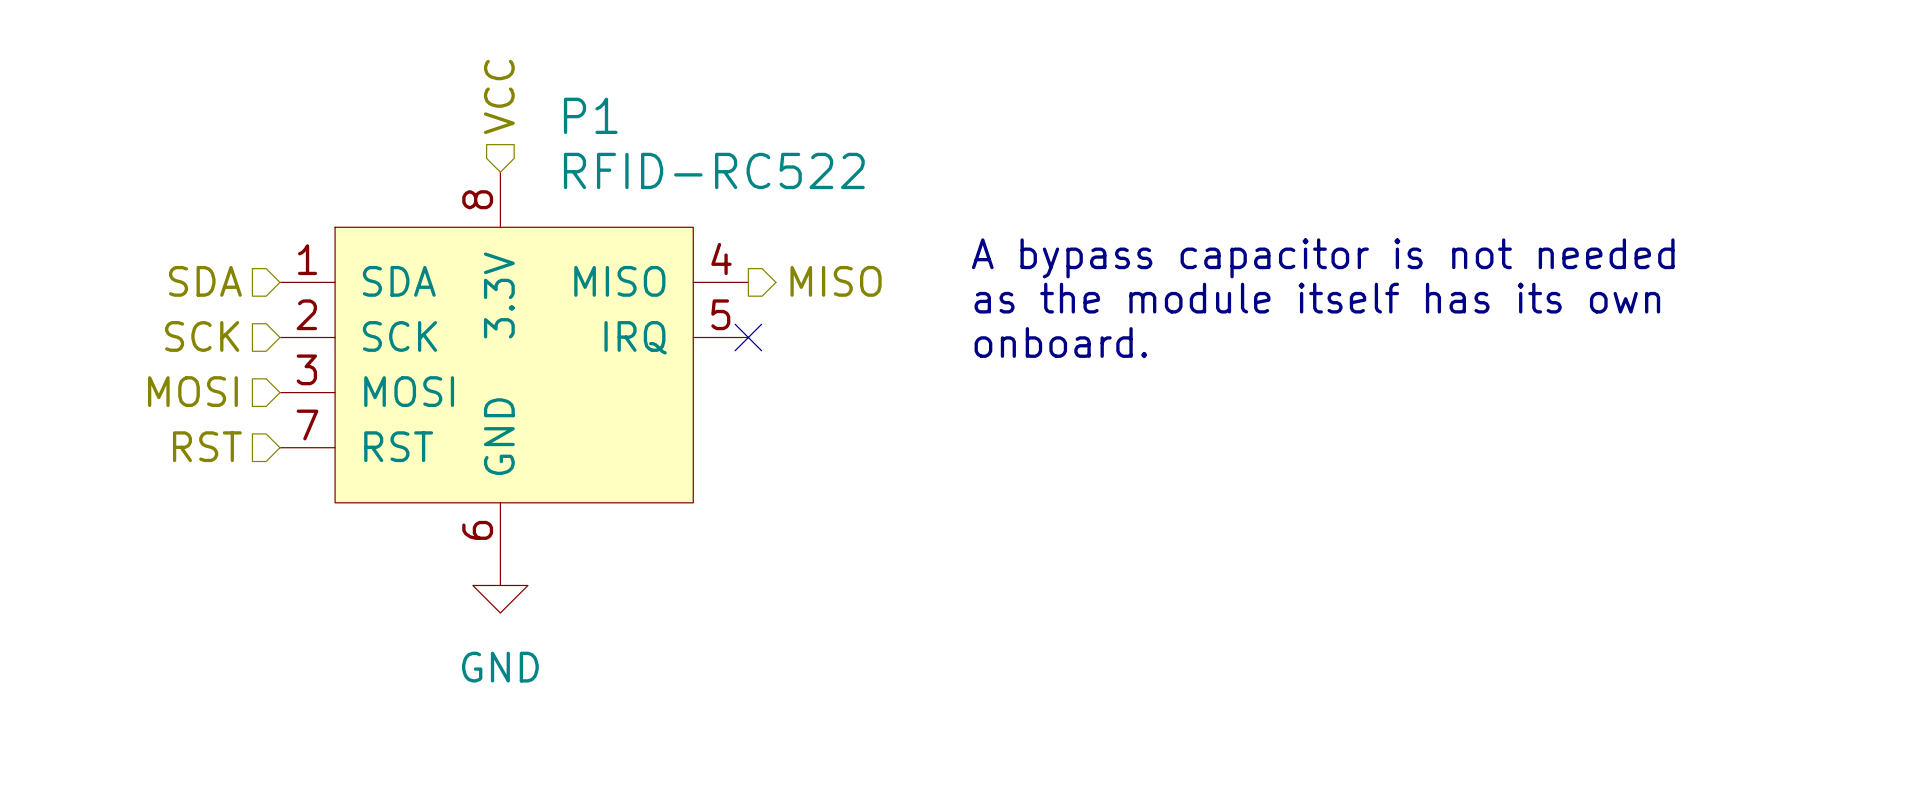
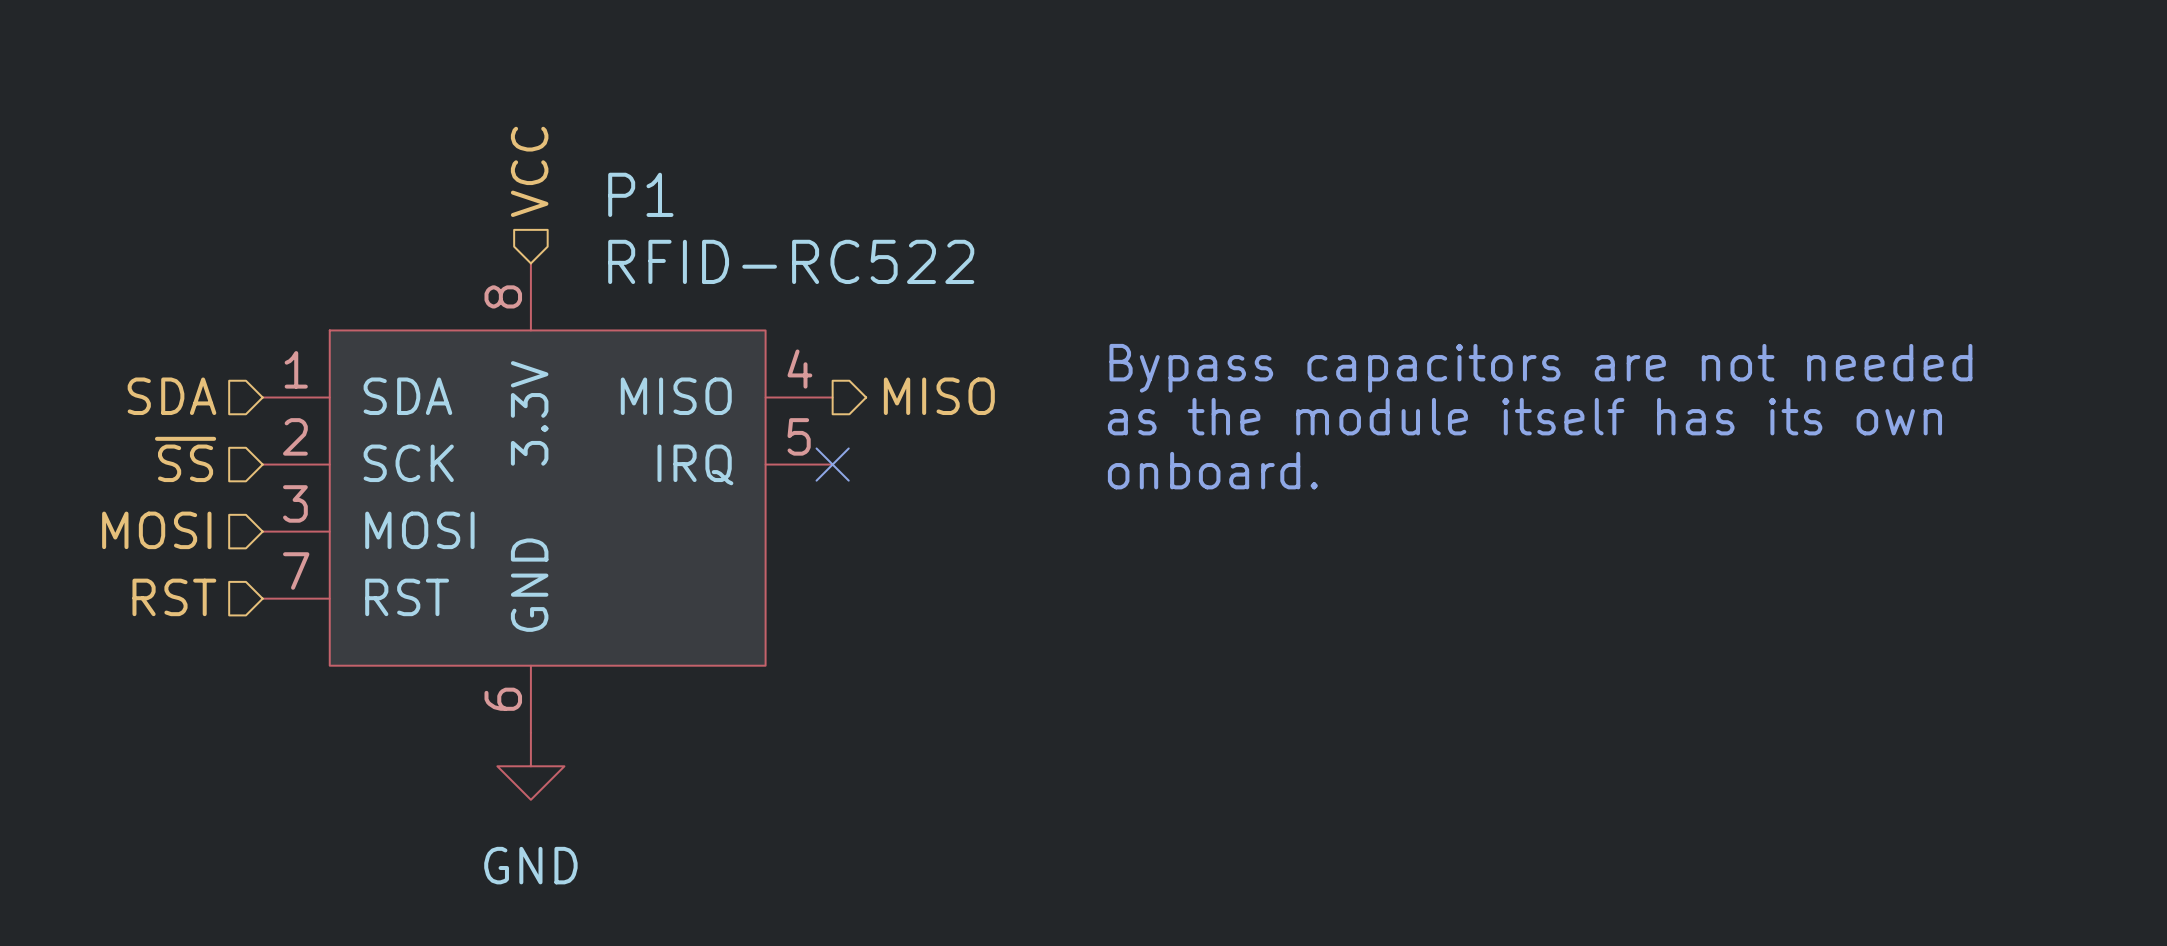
text: A bypass capacitor is not needed (1323, 258) -> Bypass capacitors are not needed (1540, 368)
hierarchical label: SCK (202, 336) -> ~{SS} (185, 459)

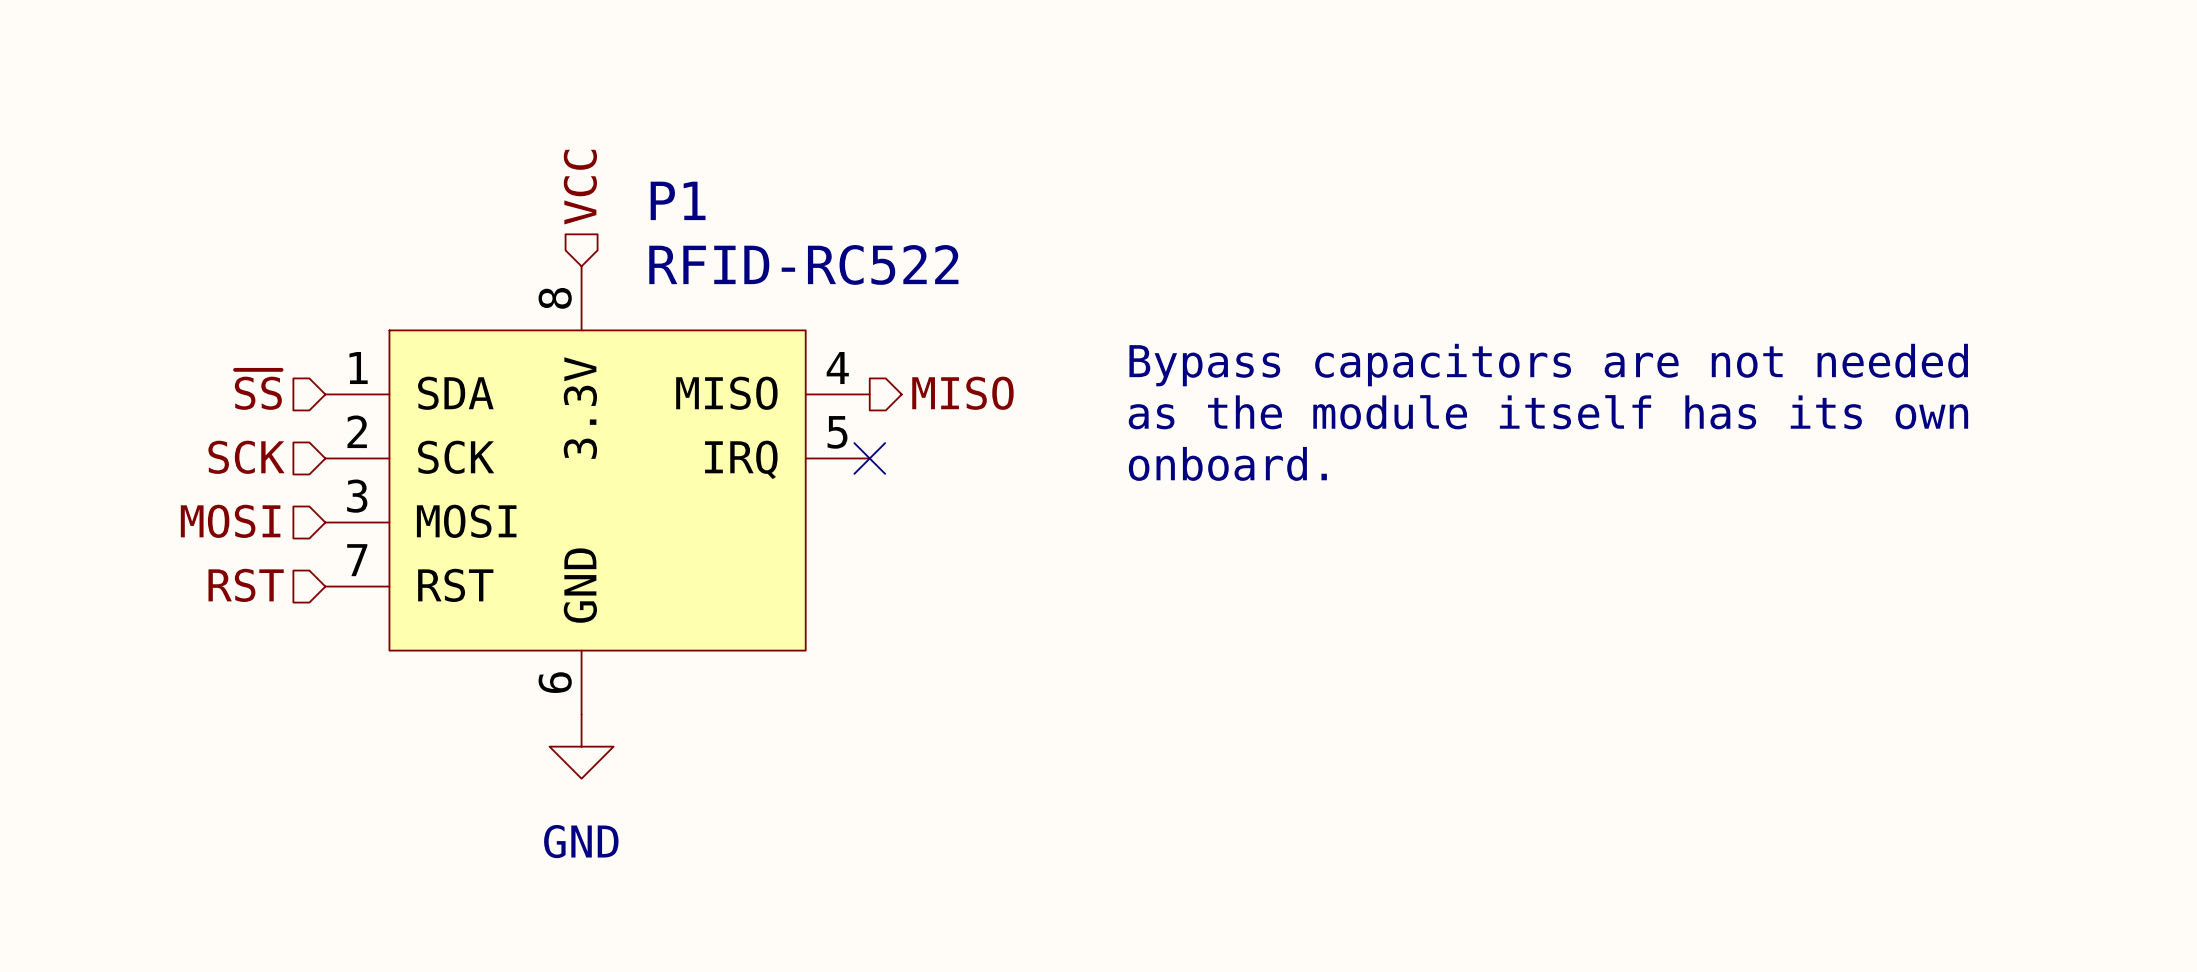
hierarchical label: SDA (171, 396) -> ~{SS} (258, 389)
hierarchical label: ~{SS} (185, 459) -> SCK (246, 457)

